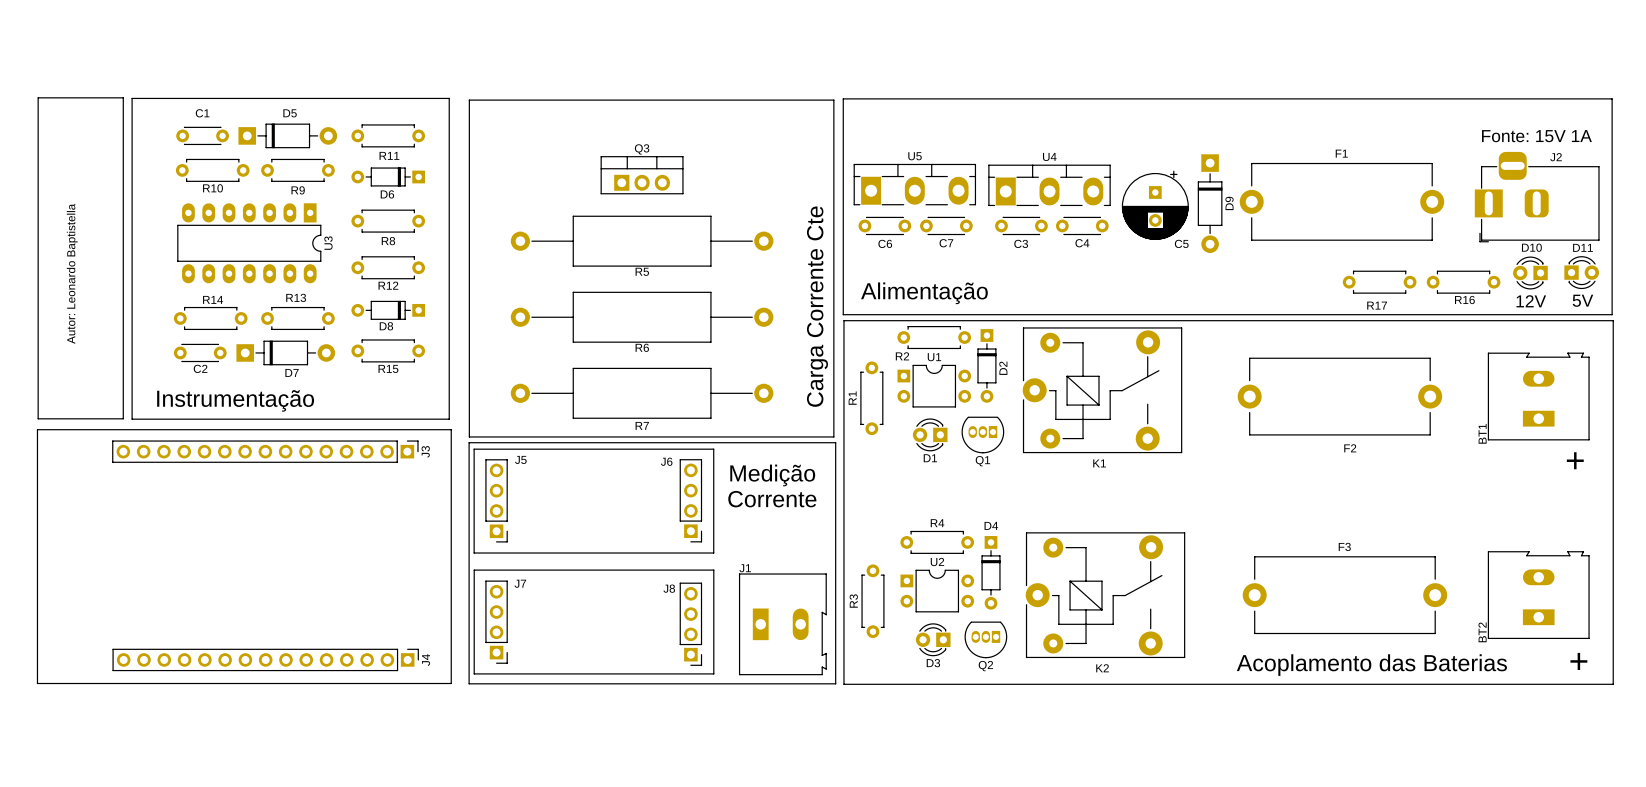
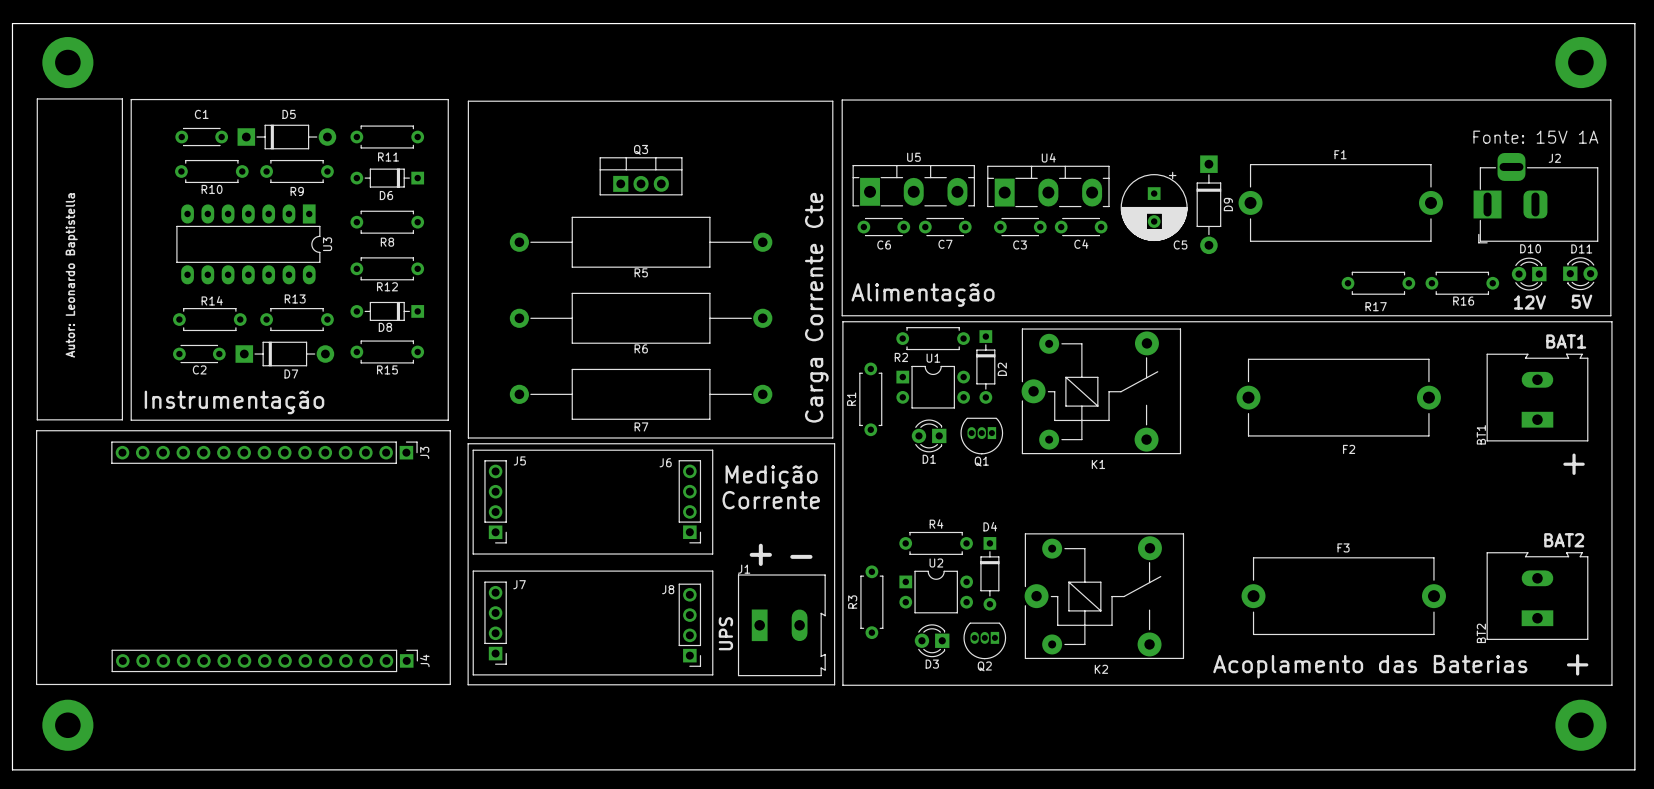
board edge: none -> (12, 23) (1634, 23) (1634, 769) (12, 769) (12, 23)
part: none -> (67, 62)
part: none -> (1580, 62)
text: none -> BAT1 (1566, 341)
text: none -> BAT2 (1564, 540)
text: none -> + (760, 554)
text: none -> - (801, 556)
text: none -> UPS (725, 633)
part: none -> (67, 725)
part: none -> (1580, 725)

